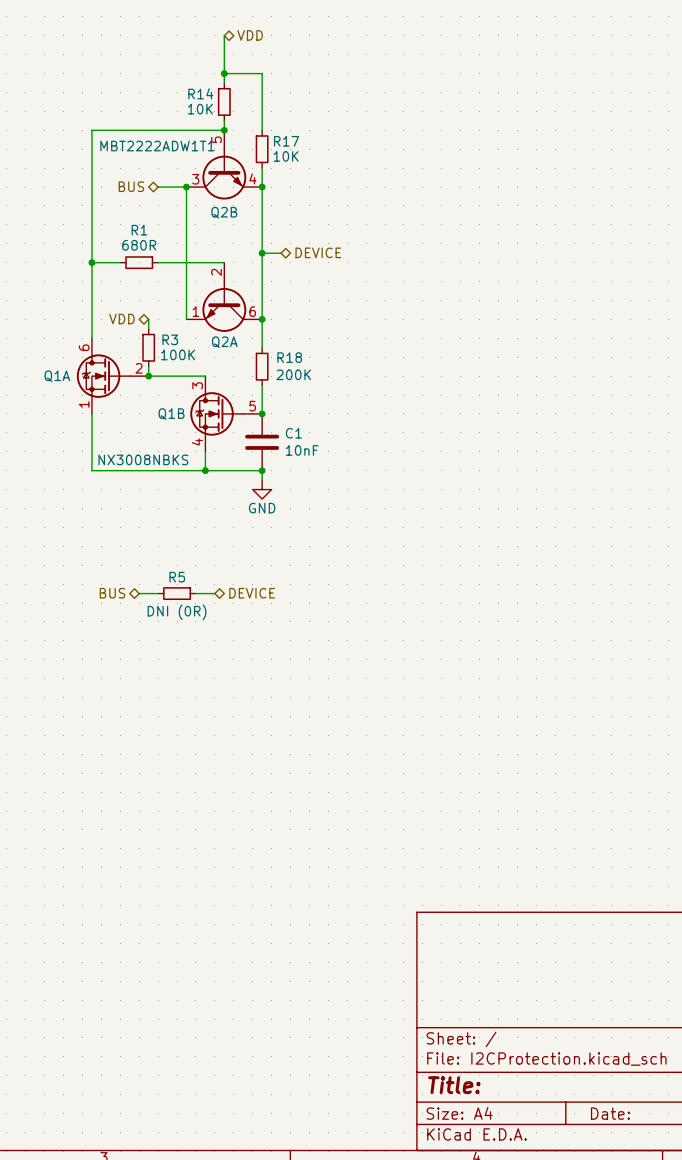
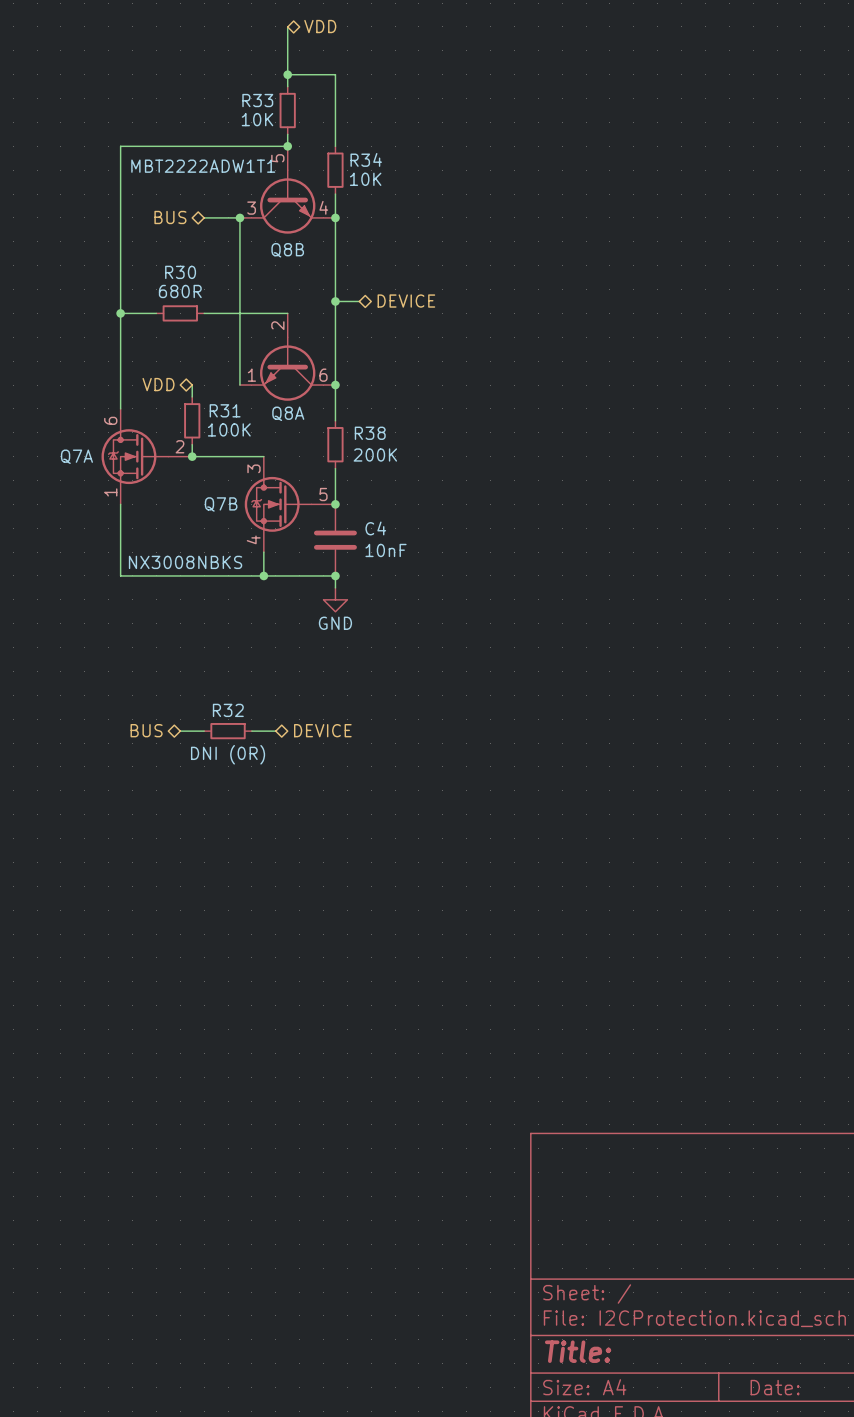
R14 name: R14 (200, 93) -> R33 (257, 100)
R17 name: R17 (286, 141) -> R34 (366, 159)
Q2B name: Q2B (224, 212) -> Q8B (287, 250)
R1 name: R1 (139, 230) -> R30 (180, 272)
R3 name: R3 (170, 339) -> R31 (225, 410)
Q2A name: Q2A (224, 342) -> Q8A (288, 413)
R18 name: R18 (289, 357) -> R38 (370, 433)
Q1A name: Q1A (57, 376) -> Q7A (76, 456)
Q1B name: Q1B (171, 414) -> Q7B (221, 504)
C1 name: C1 (293, 433) -> C4 (375, 528)
R5 name: R5 (177, 577) -> R32 (228, 710)

